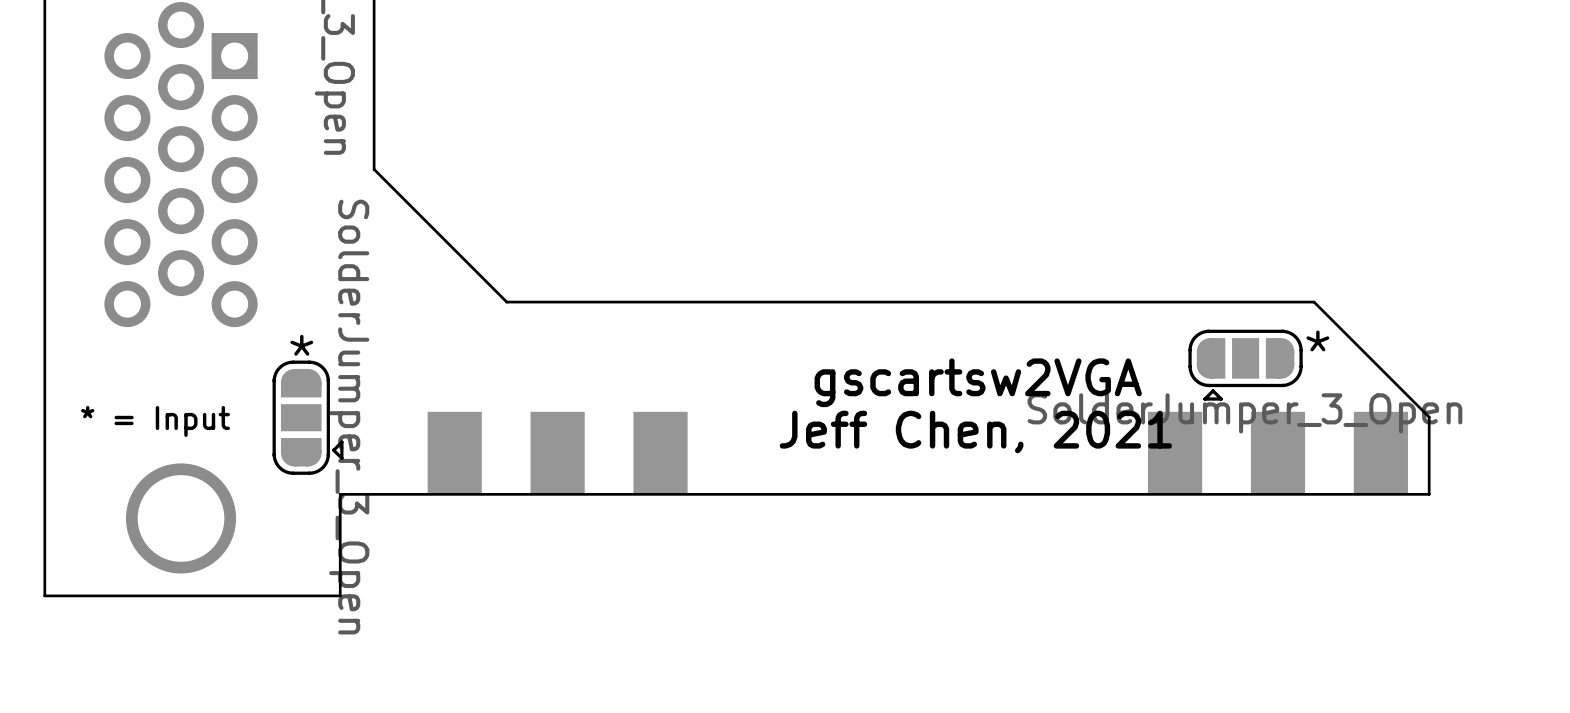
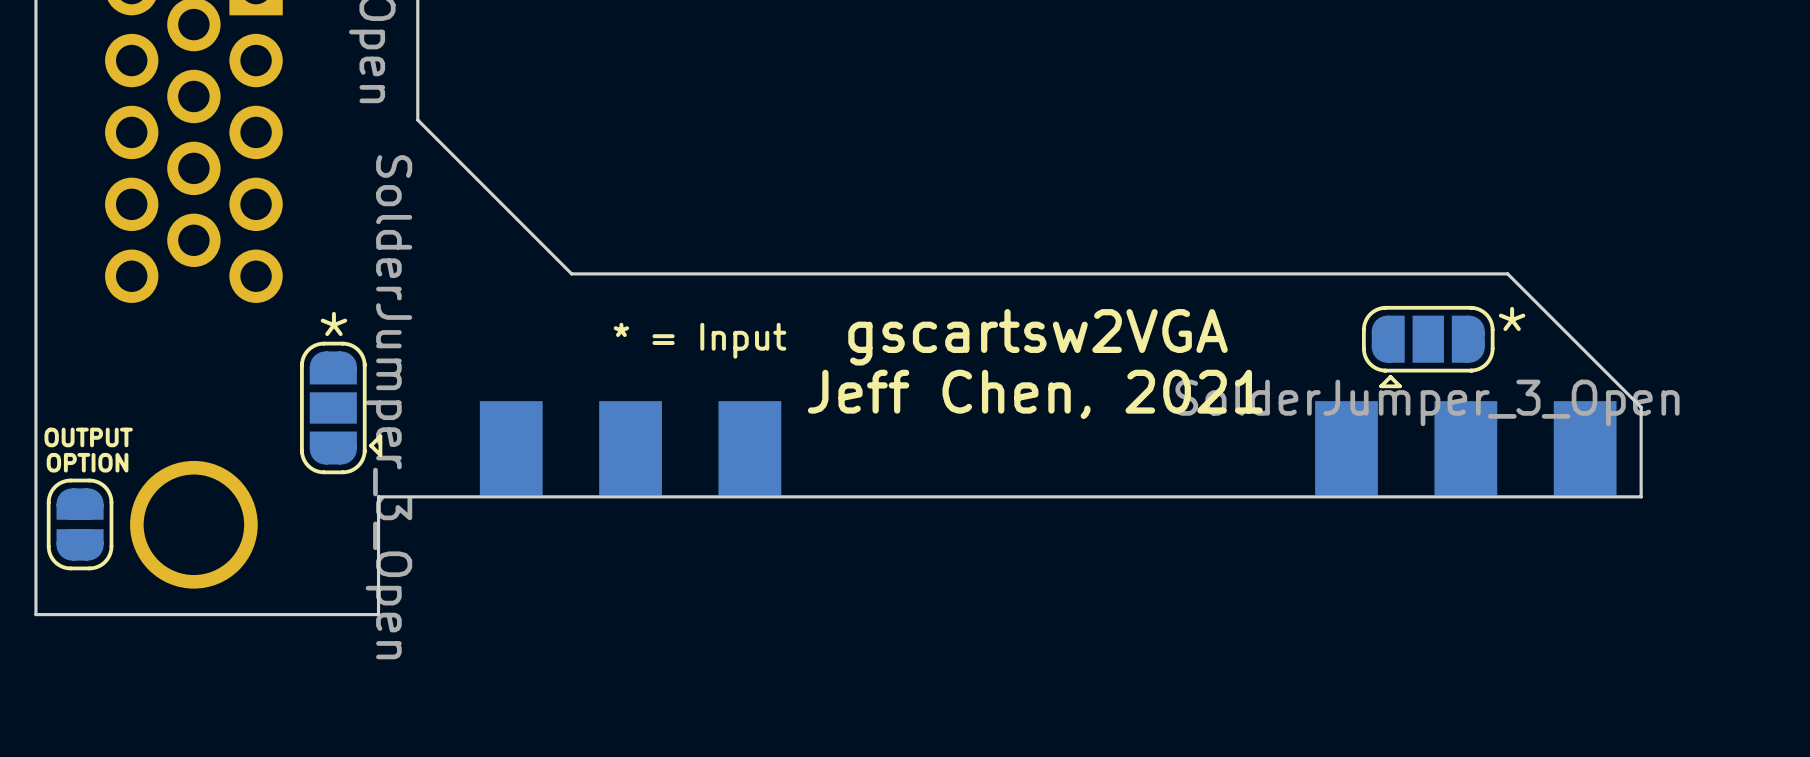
text position: gscartsw2VGA (978, 382) -> gscartsw2VGA (1038, 337)
text position: * = Input (155, 421) -> * = Input (700, 340)
text position: Jeff Chen, 2021 (975, 431) -> Jeff Chen, 2021 (1035, 394)
text: none -> OUTPUT (88, 437)
text: none -> OPTION (87, 462)
part: none -> (80, 524)

